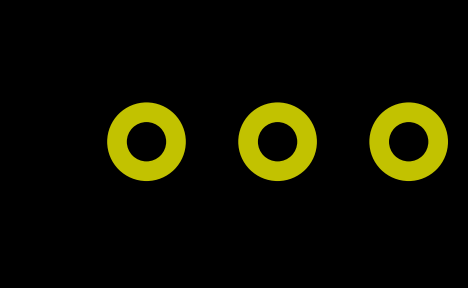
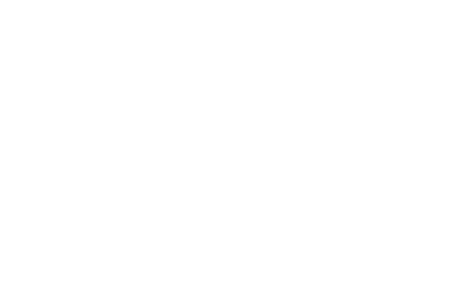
part: (277, 141) -> none

